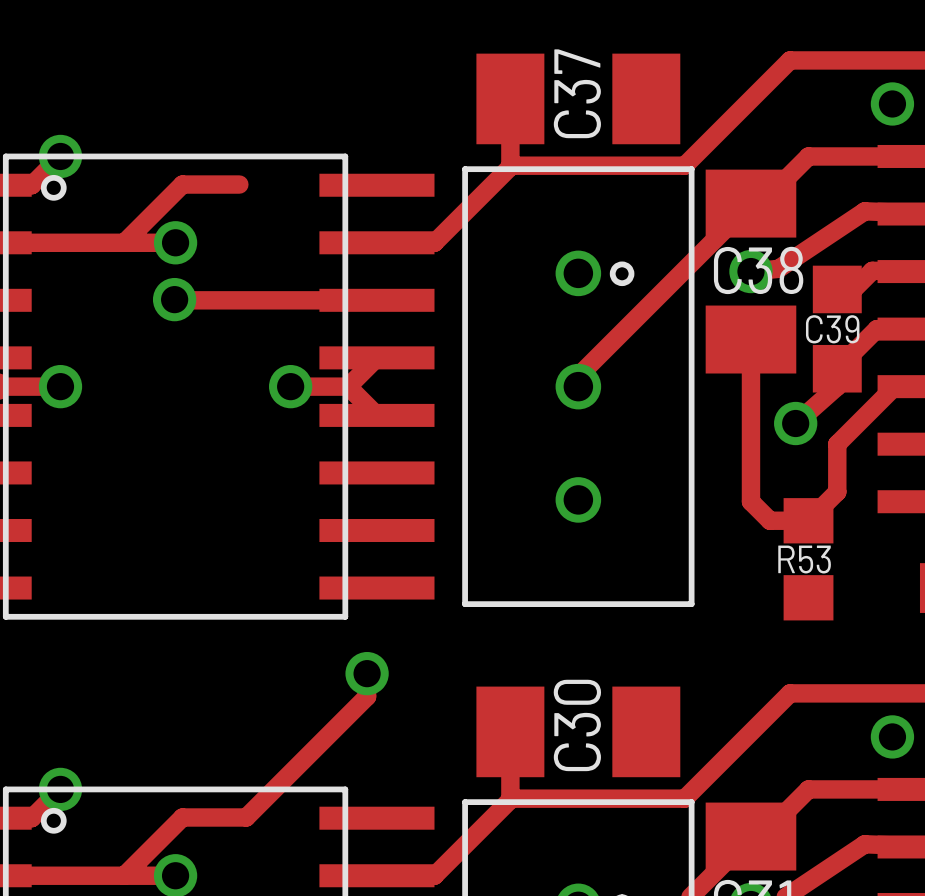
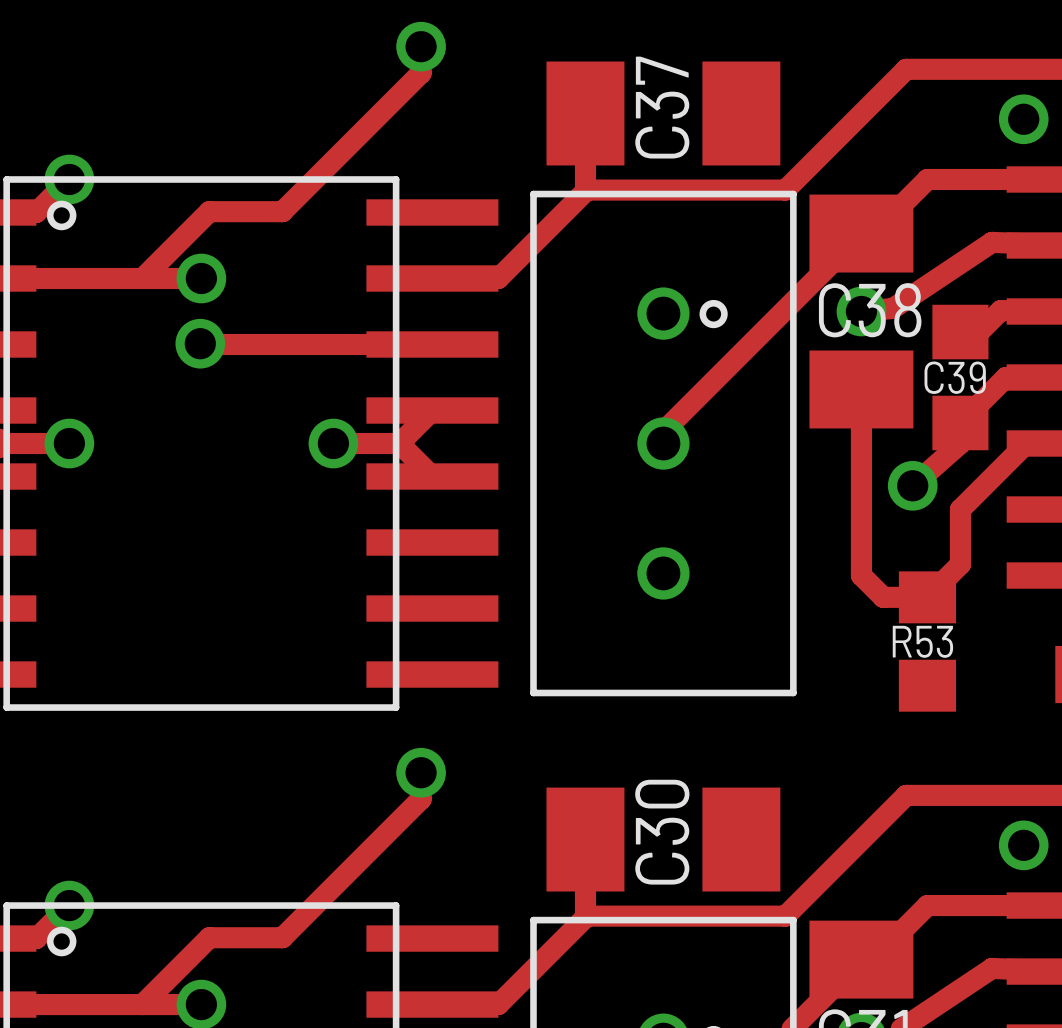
track: none -> (421, 46) (421, 73) (282, 211) (274, 211)
via: none -> (421, 46)

